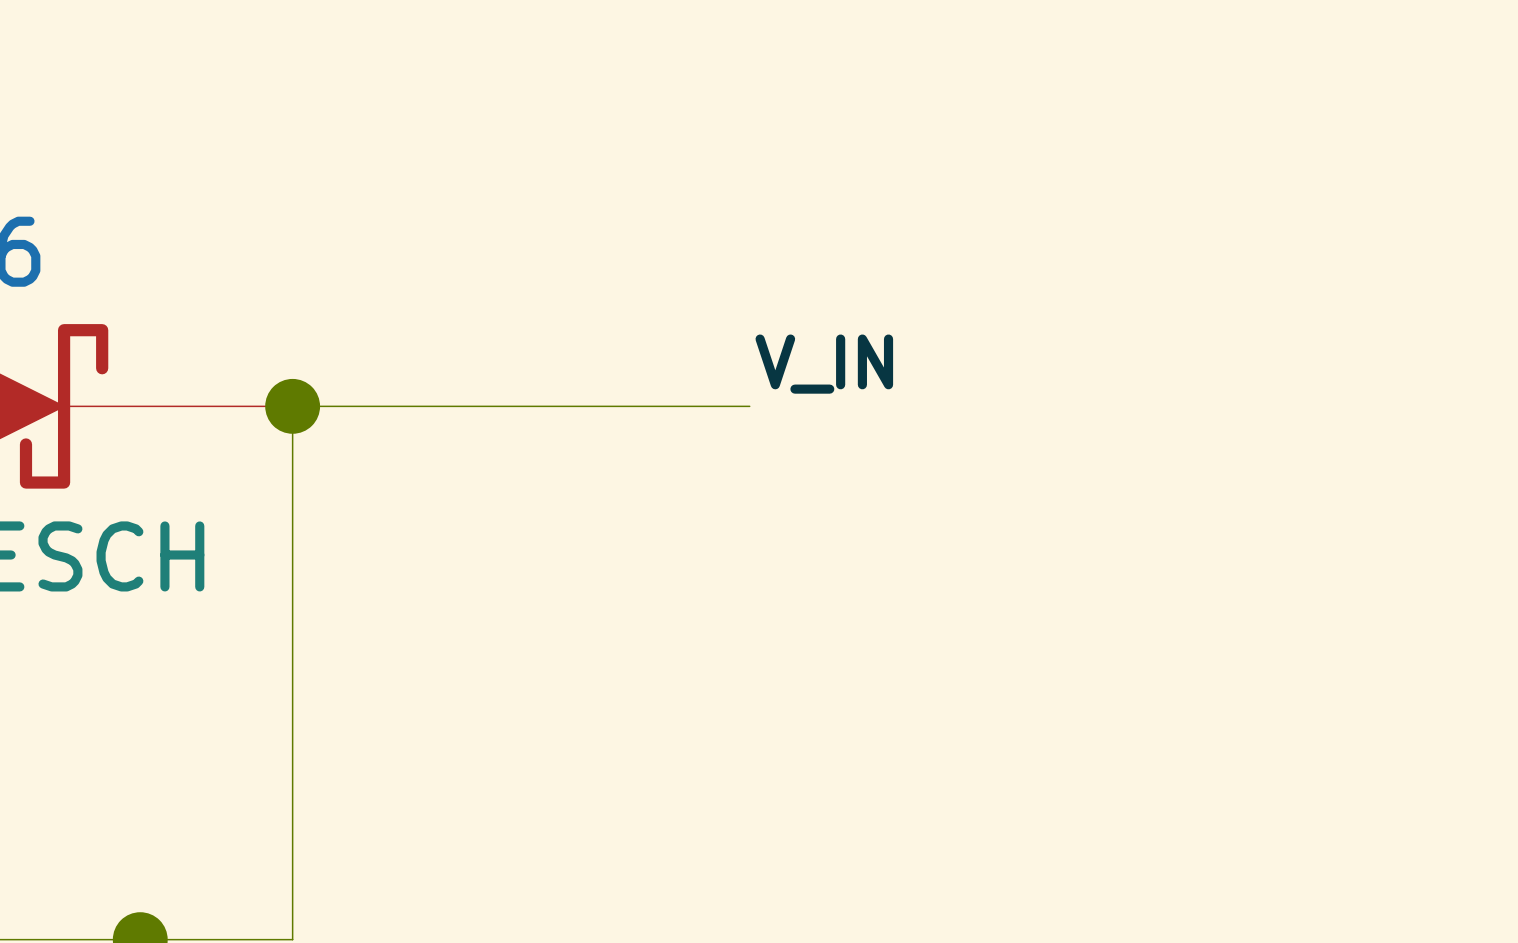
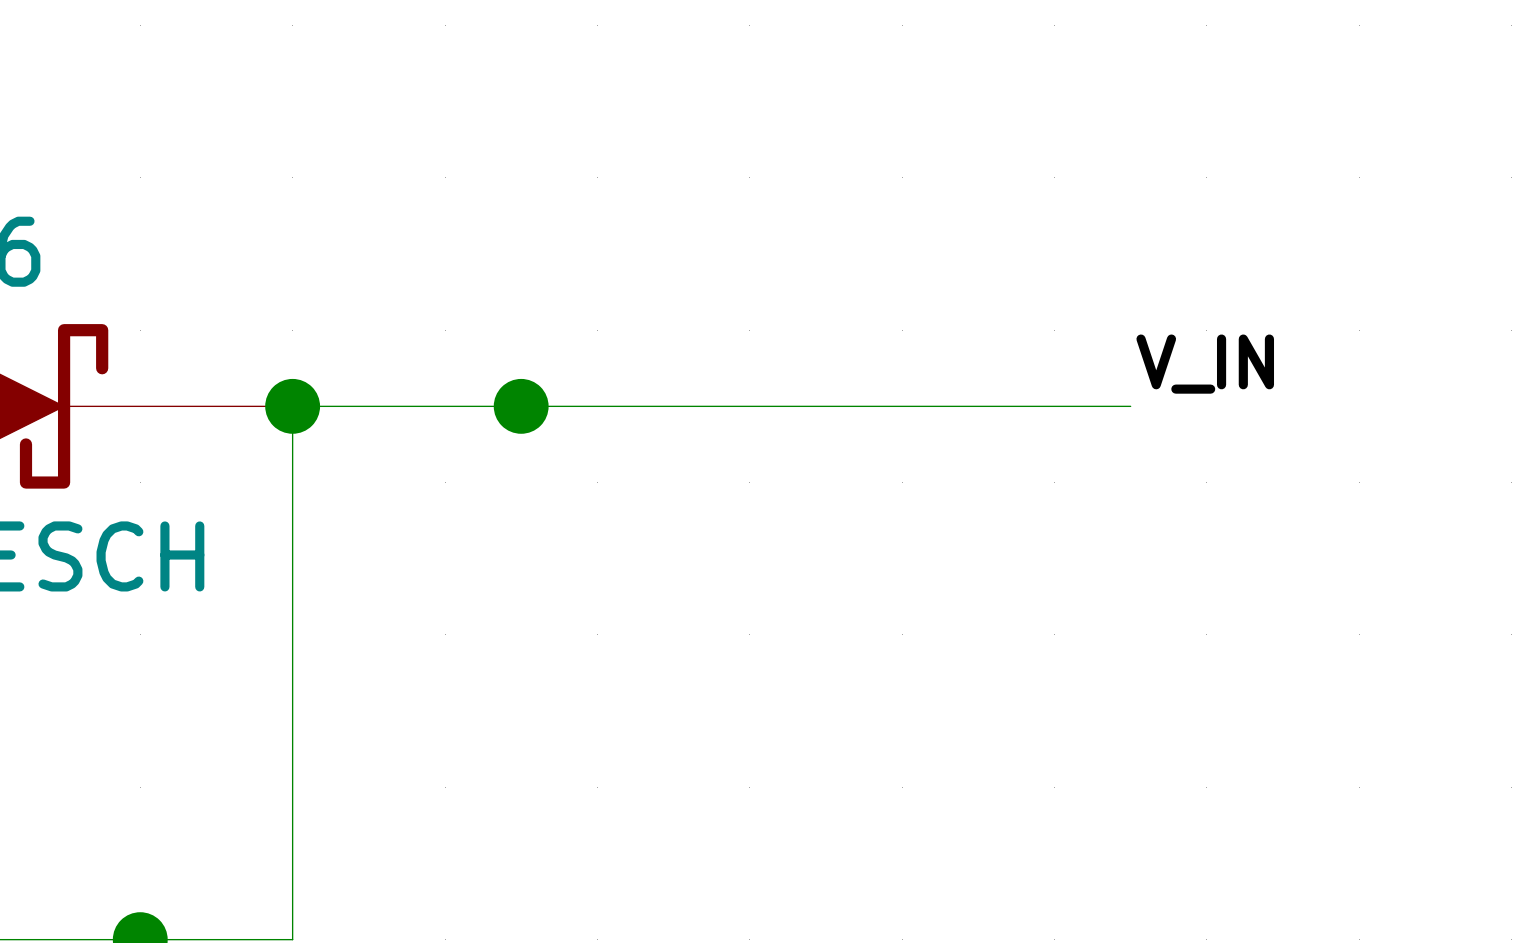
label position: V_IN (824, 364) -> V_IN (1205, 364)
junction: none -> (521, 406)
wire: none -> (749, 406) (1130, 406)

